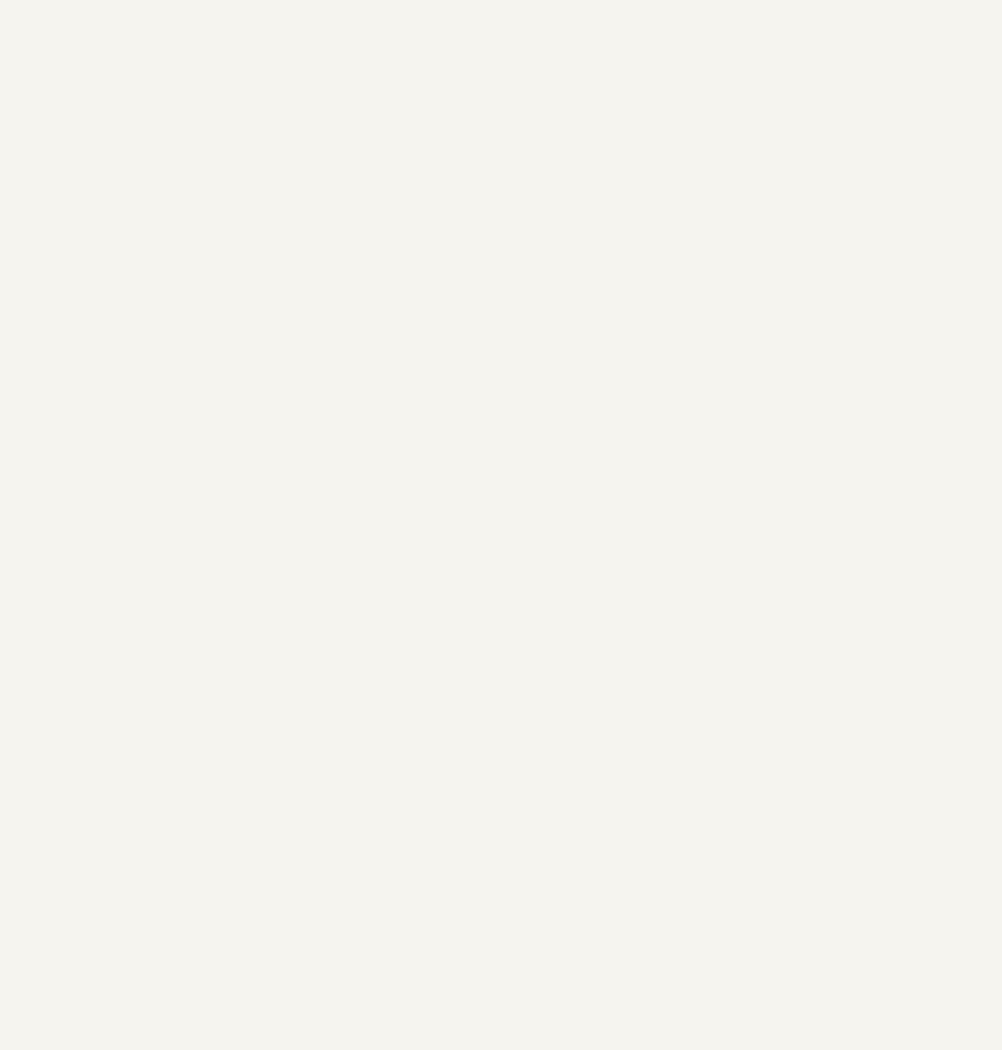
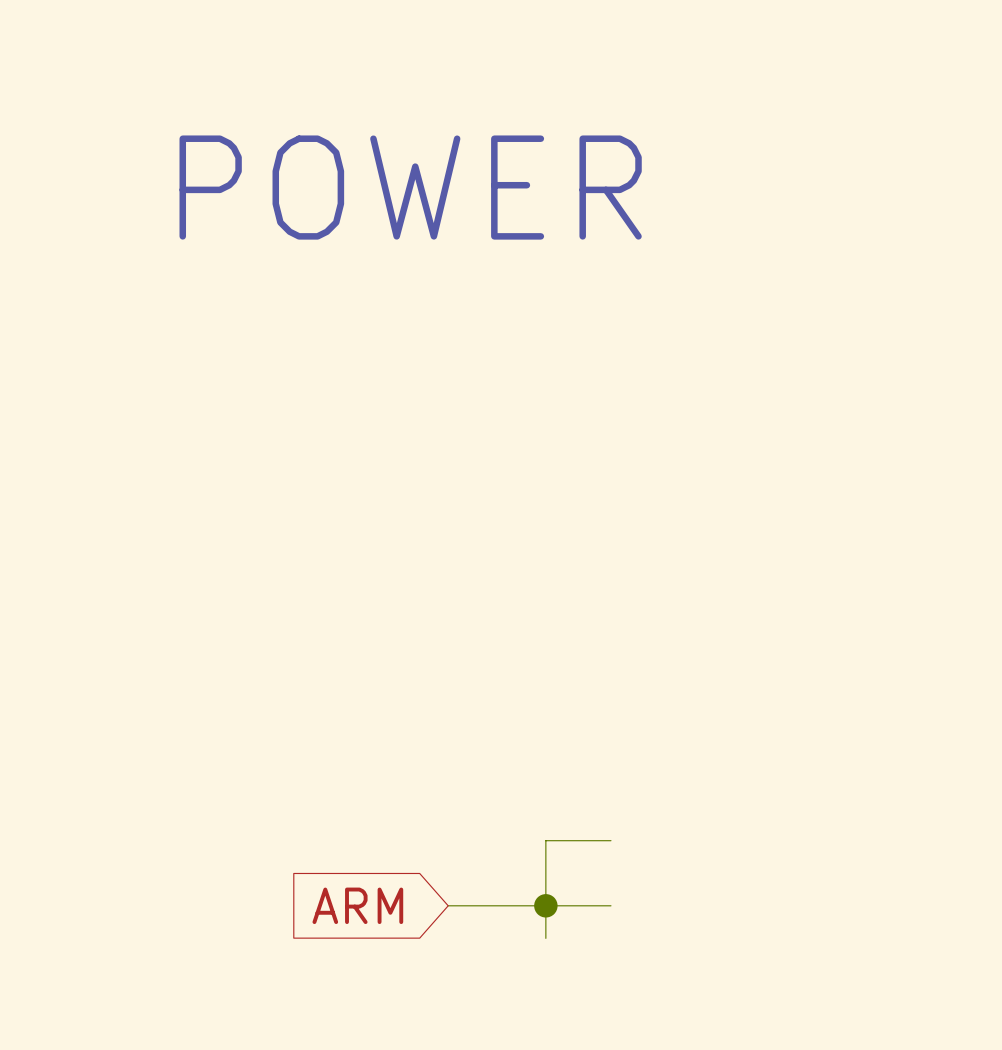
text: none -> POWER (410, 187)
wire: none -> (610, 840) (545, 840) (545, 938)
global label: none -> ARM (357, 905)
wire: none -> (448, 905) (610, 905)
junction: none -> (545, 905)

